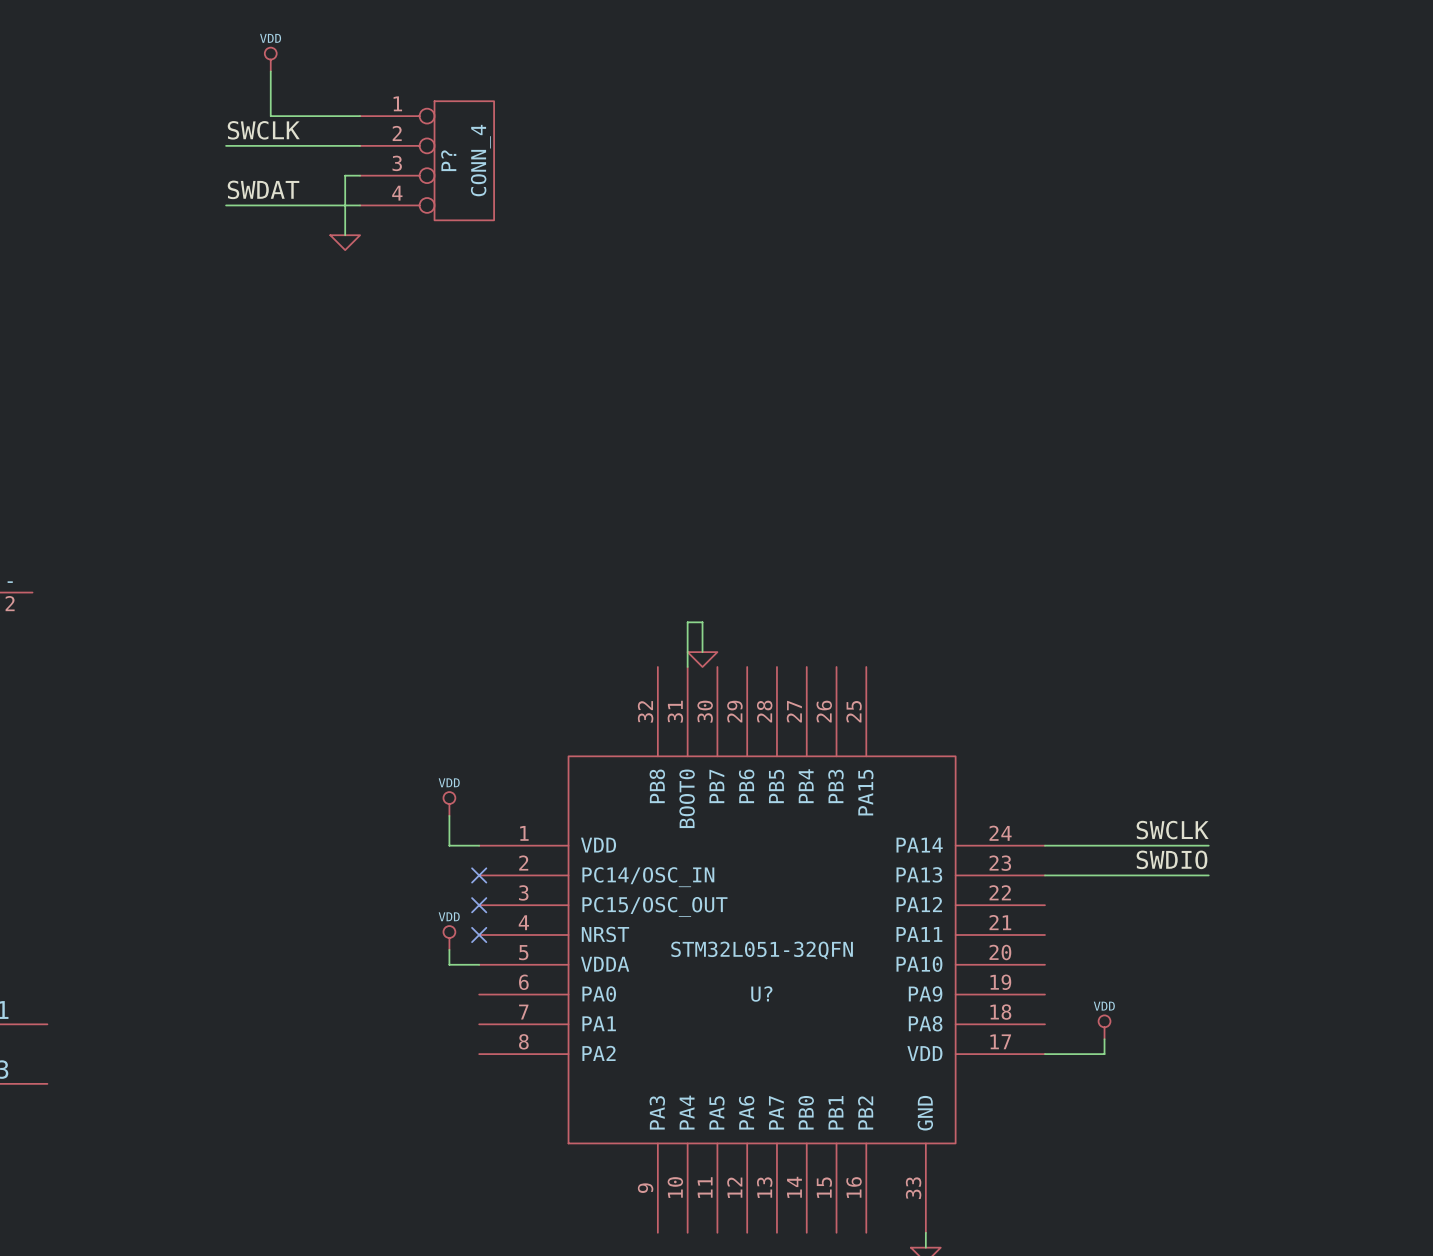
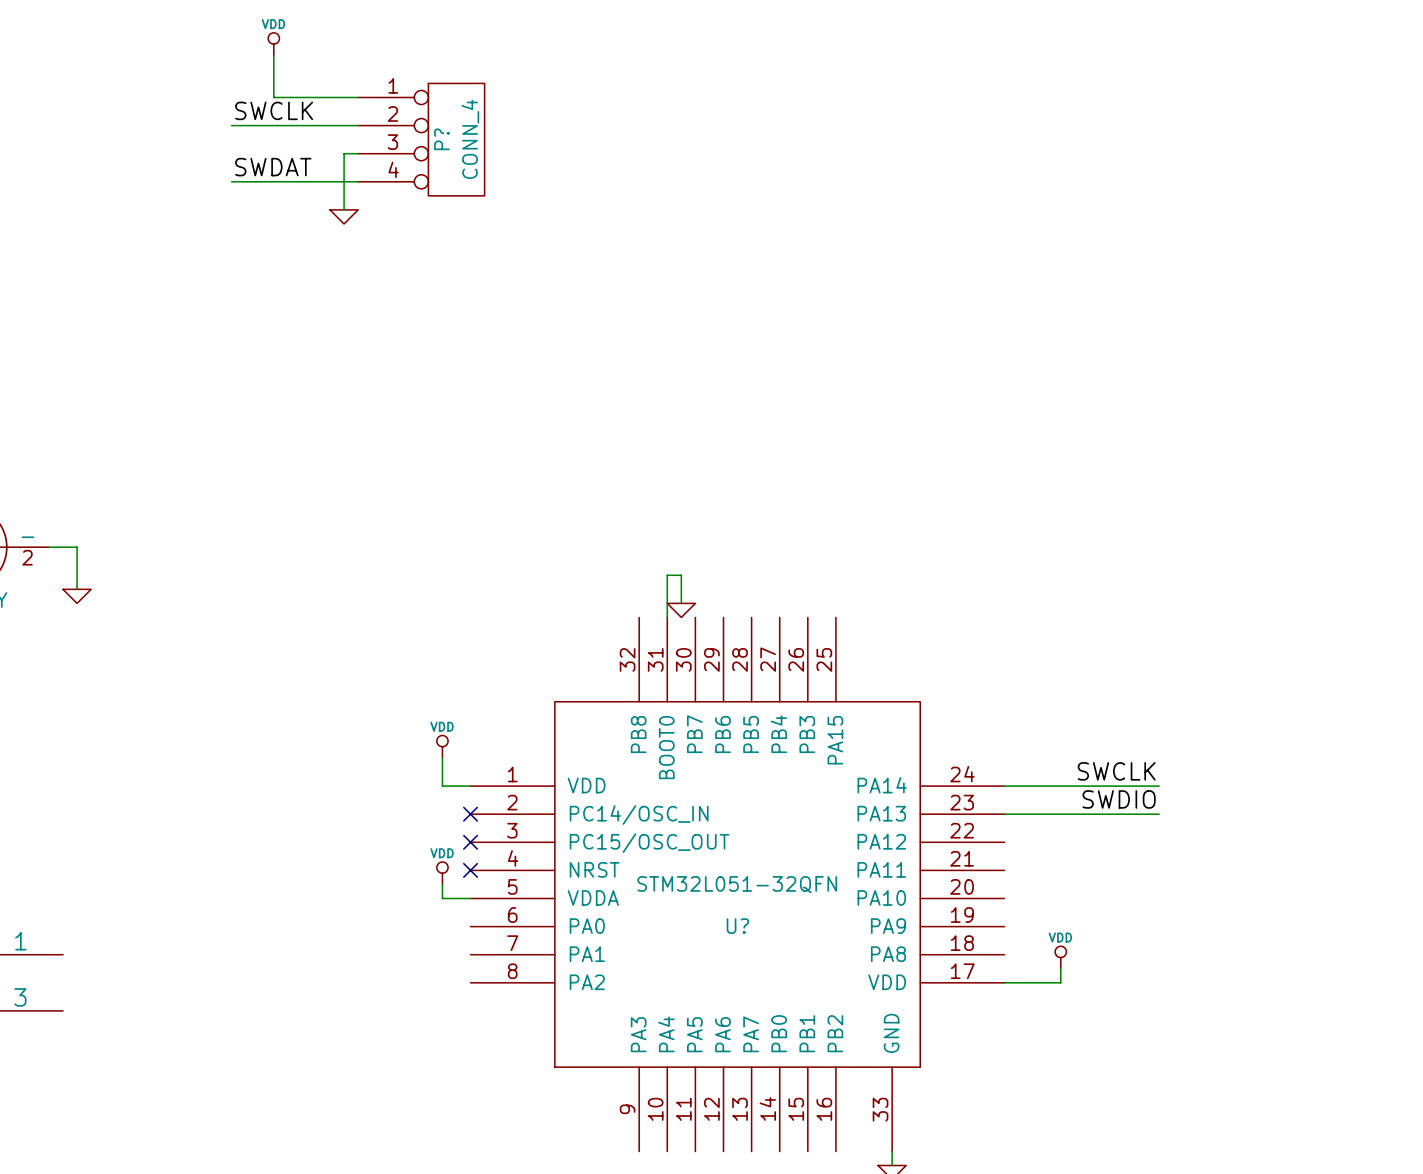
wire: none -> (48, 547) (77, 547) (77, 589)
power symbol: none -> (77, 596)

